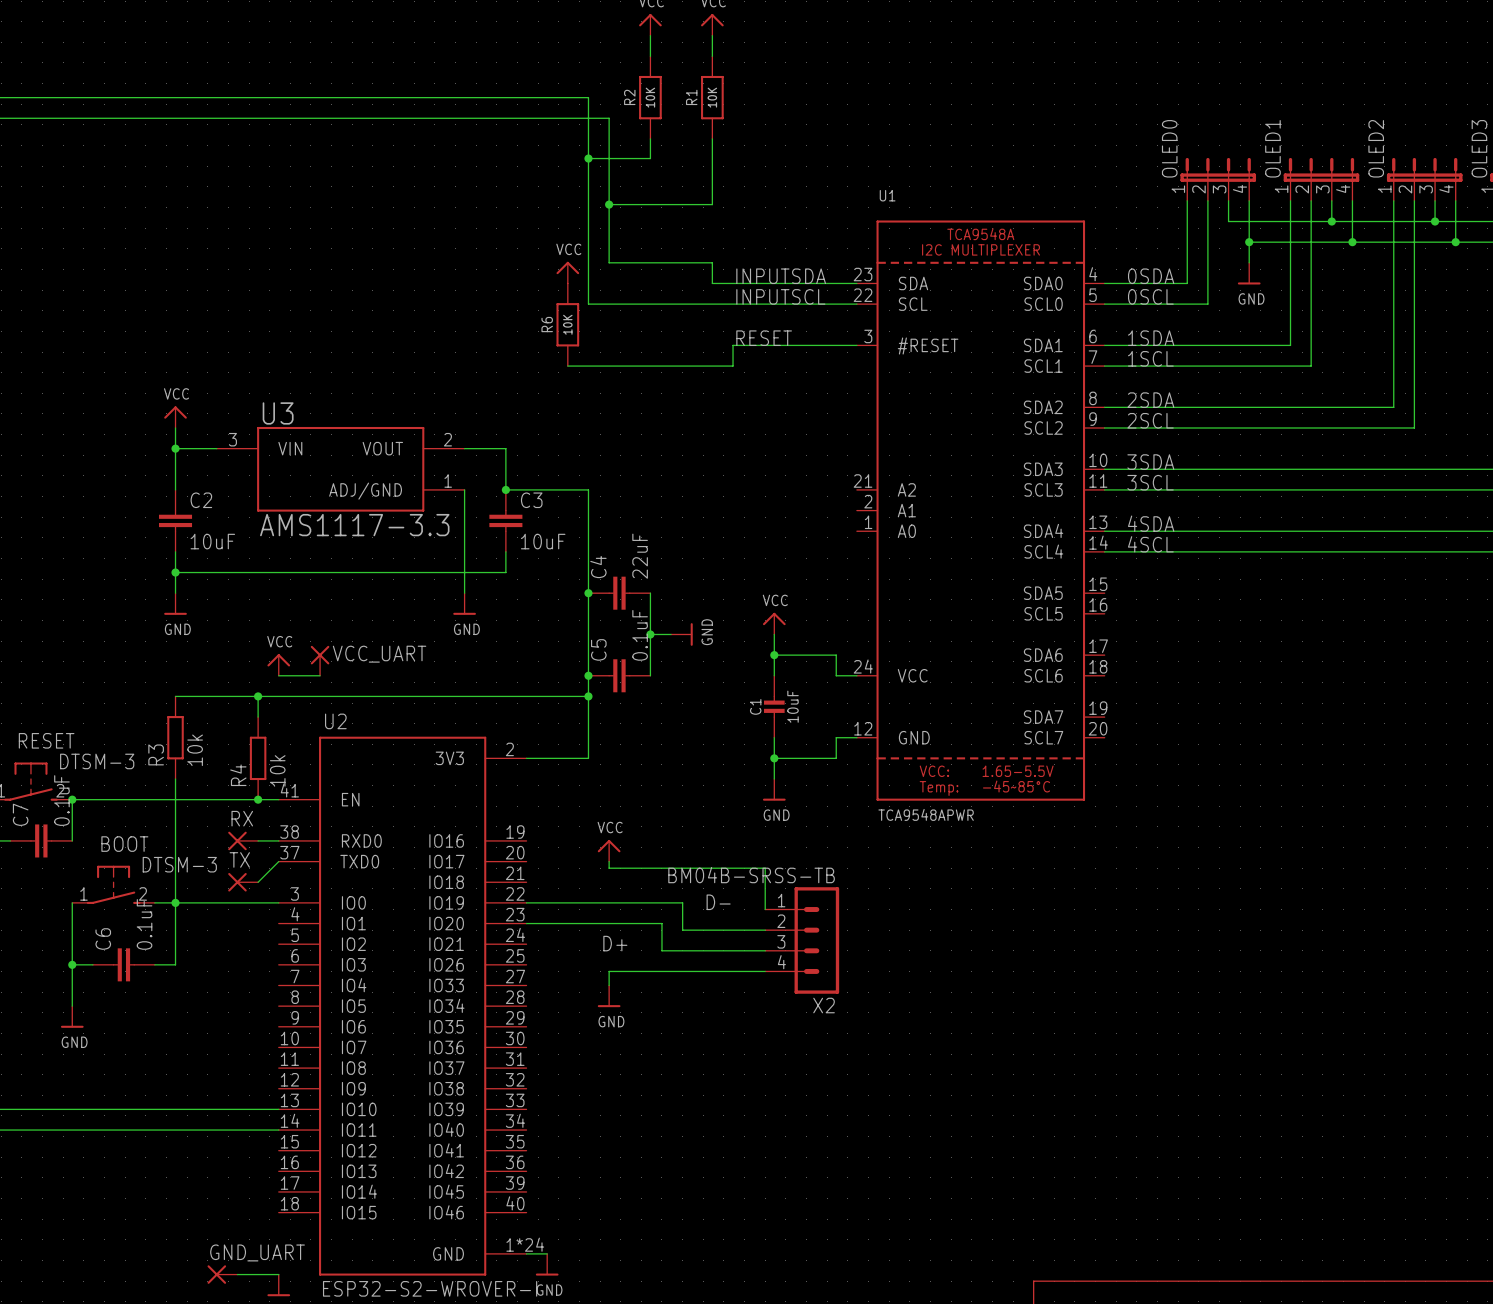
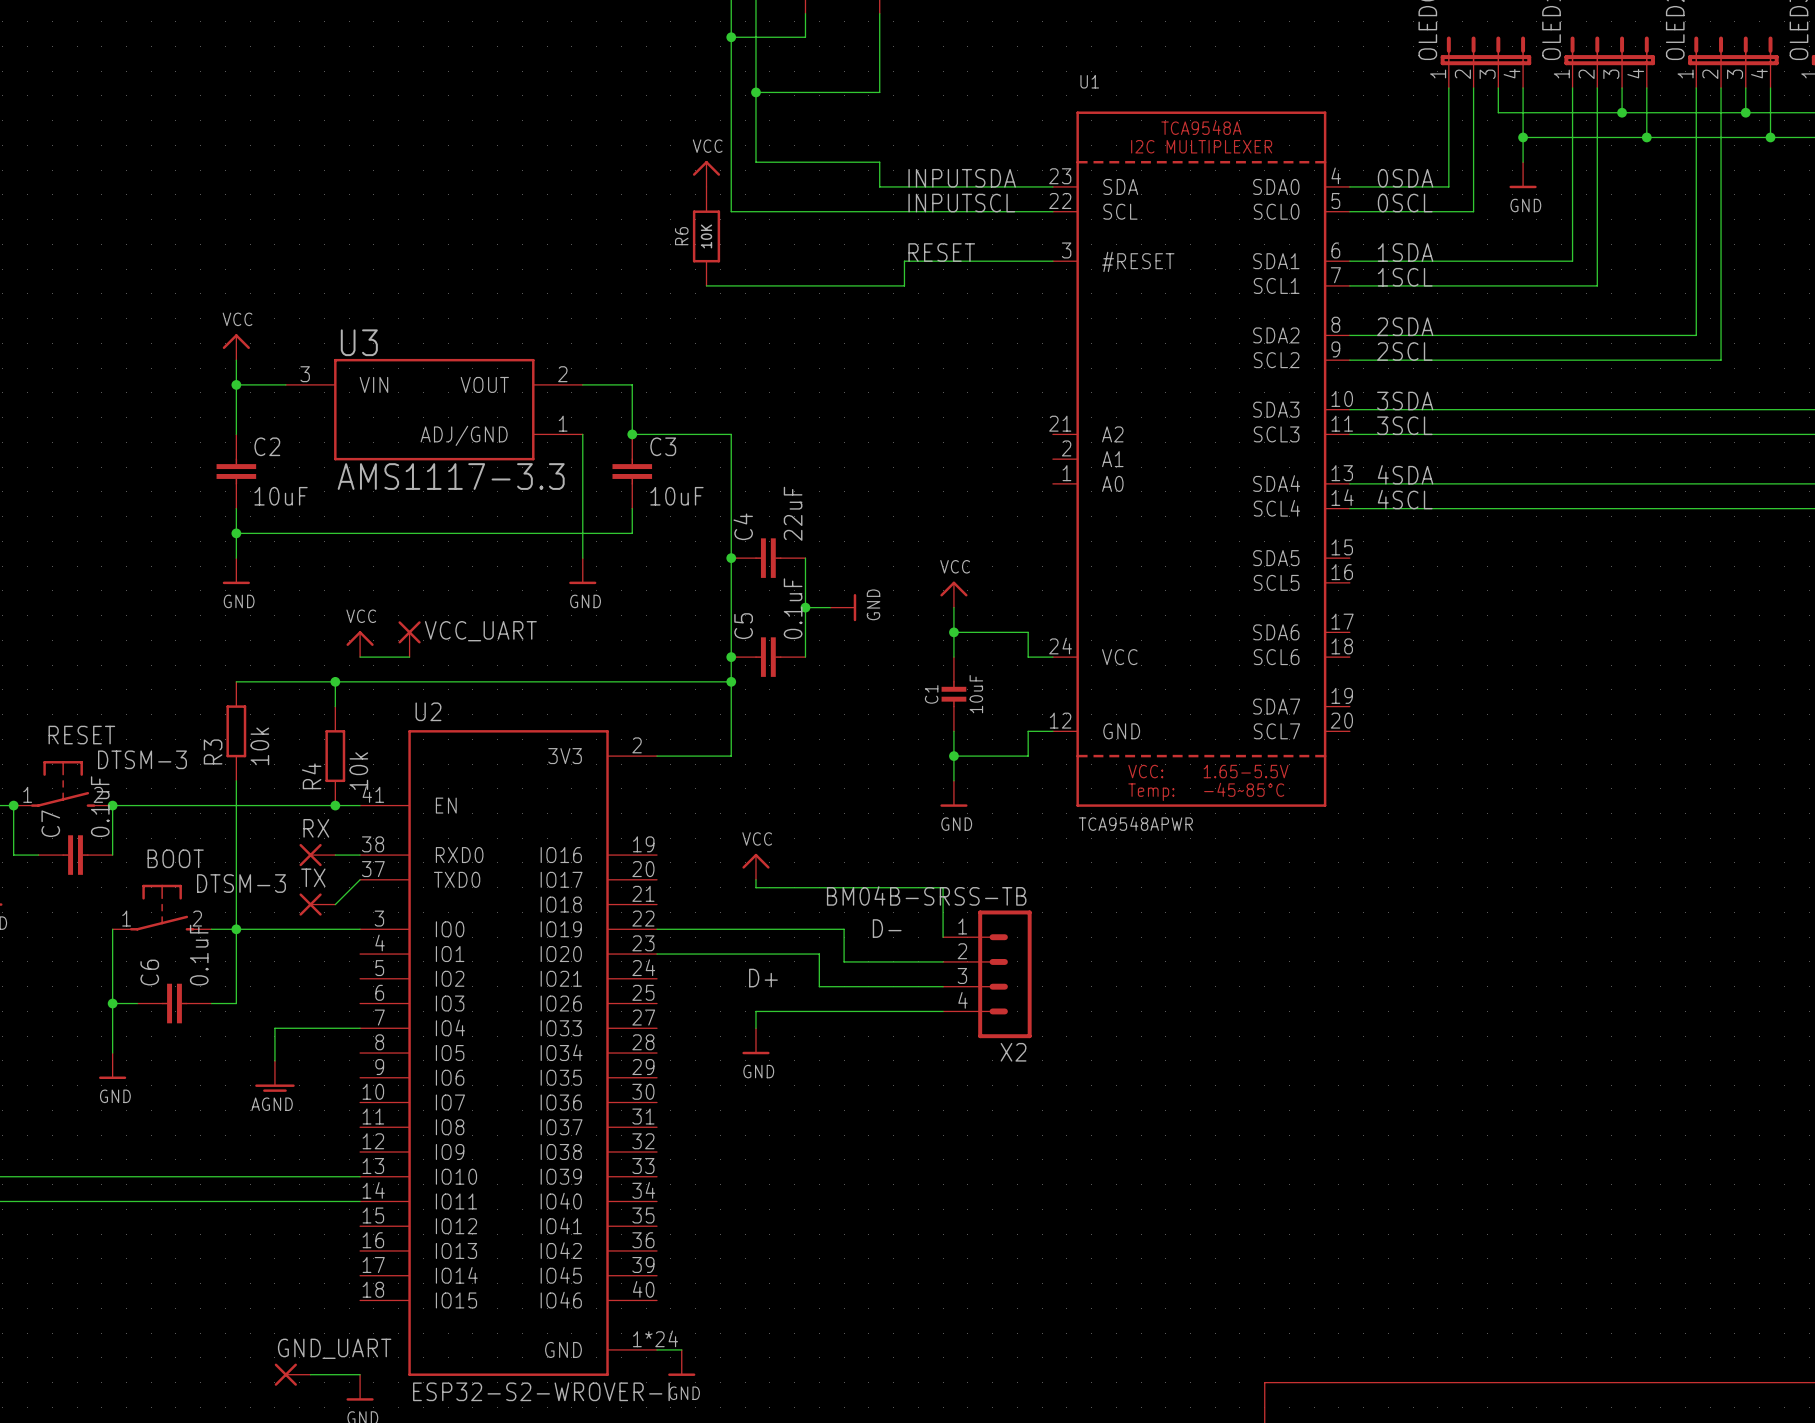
wire: none -> (360, 1028) (274, 1028) (274, 1060)
power symbol: none -> AGND (274, 1076)

